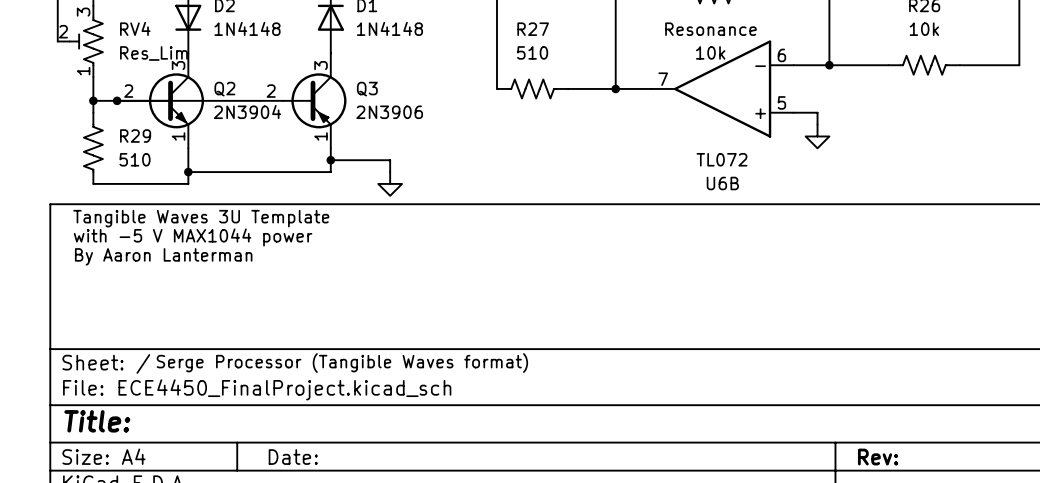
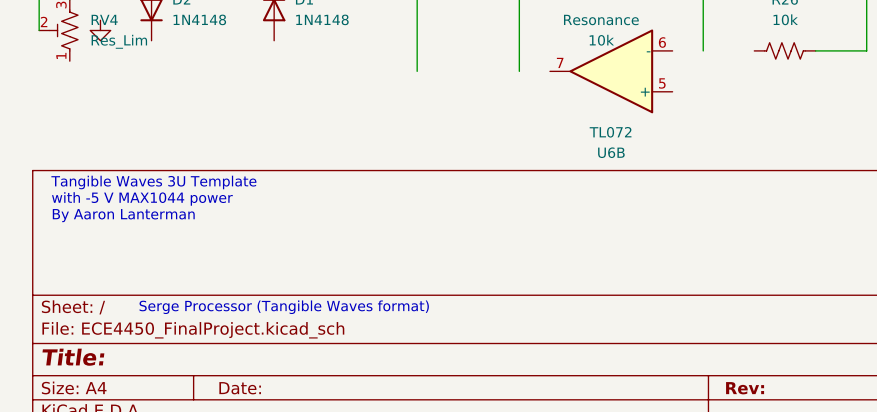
power symbol: none -> (100, 30)
wire: (793, 65) (888, 65) -> none
junction: (829, 65) -> none
wire: (93, 77) (93, 112) -> none
R27: 510 (532, 88) -> none
wire: (568, 88) (651, 88) -> none
junction: (615, 88) -> none
wire: (93, 100) (259, 100) -> none
junction: (93, 100) -> none
junction: (117, 100) -> none
Q2: 2N3904 (160, 100) -> none
Q3: 2N3906 (303, 100) -> none
wire: (793, 112) (817, 112) (817, 124) -> none
power symbol: (817, 136) -> none
R29: 510 (93, 148) -> none
wire: (188, 148) (188, 183) (93, 183) -> none
wire: (330, 148) (330, 172) (188, 172) -> none
wire: (330, 160) (390, 160) (390, 172) -> none
junction: (330, 160) -> none
junction: (188, 172) -> none
power symbol: (390, 183) -> none

